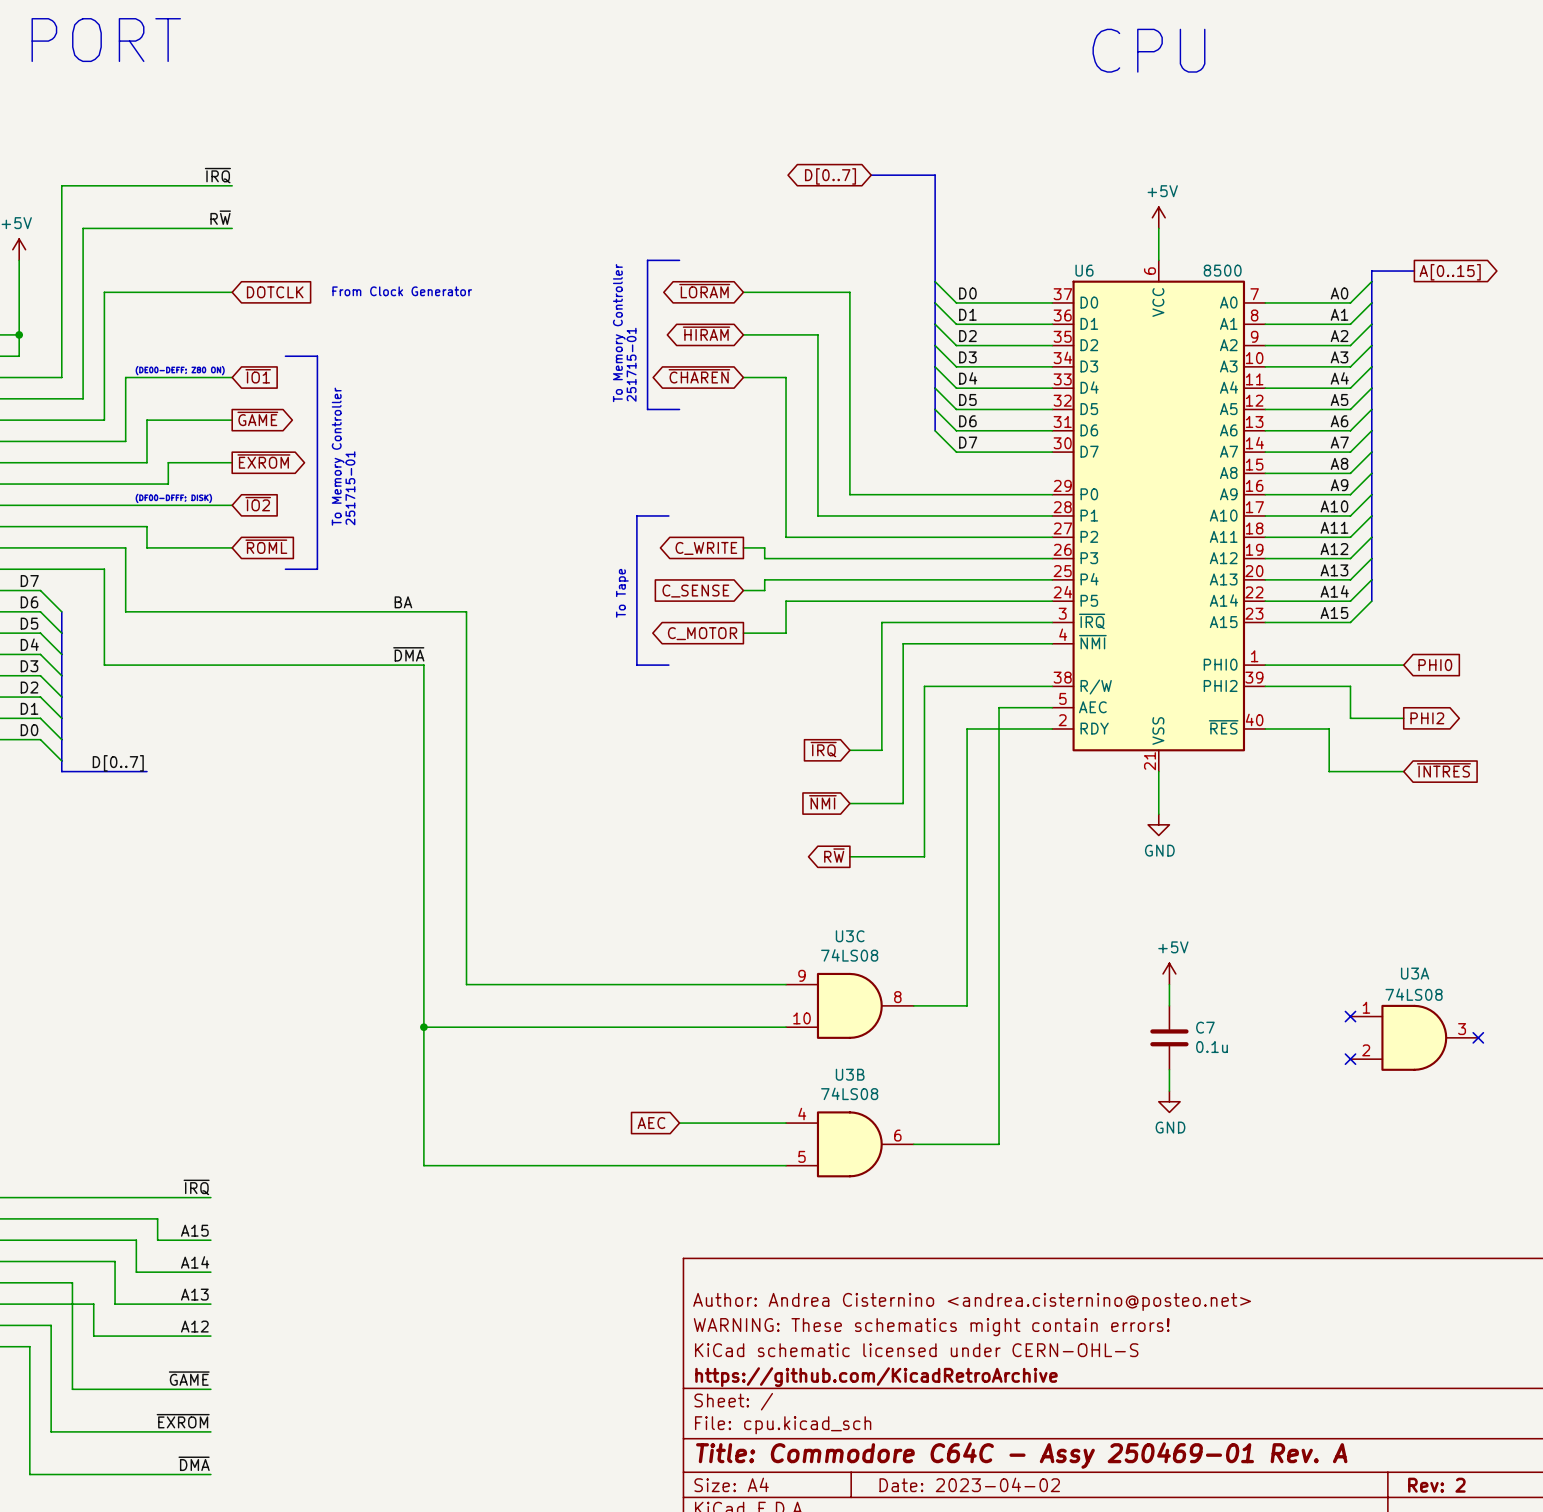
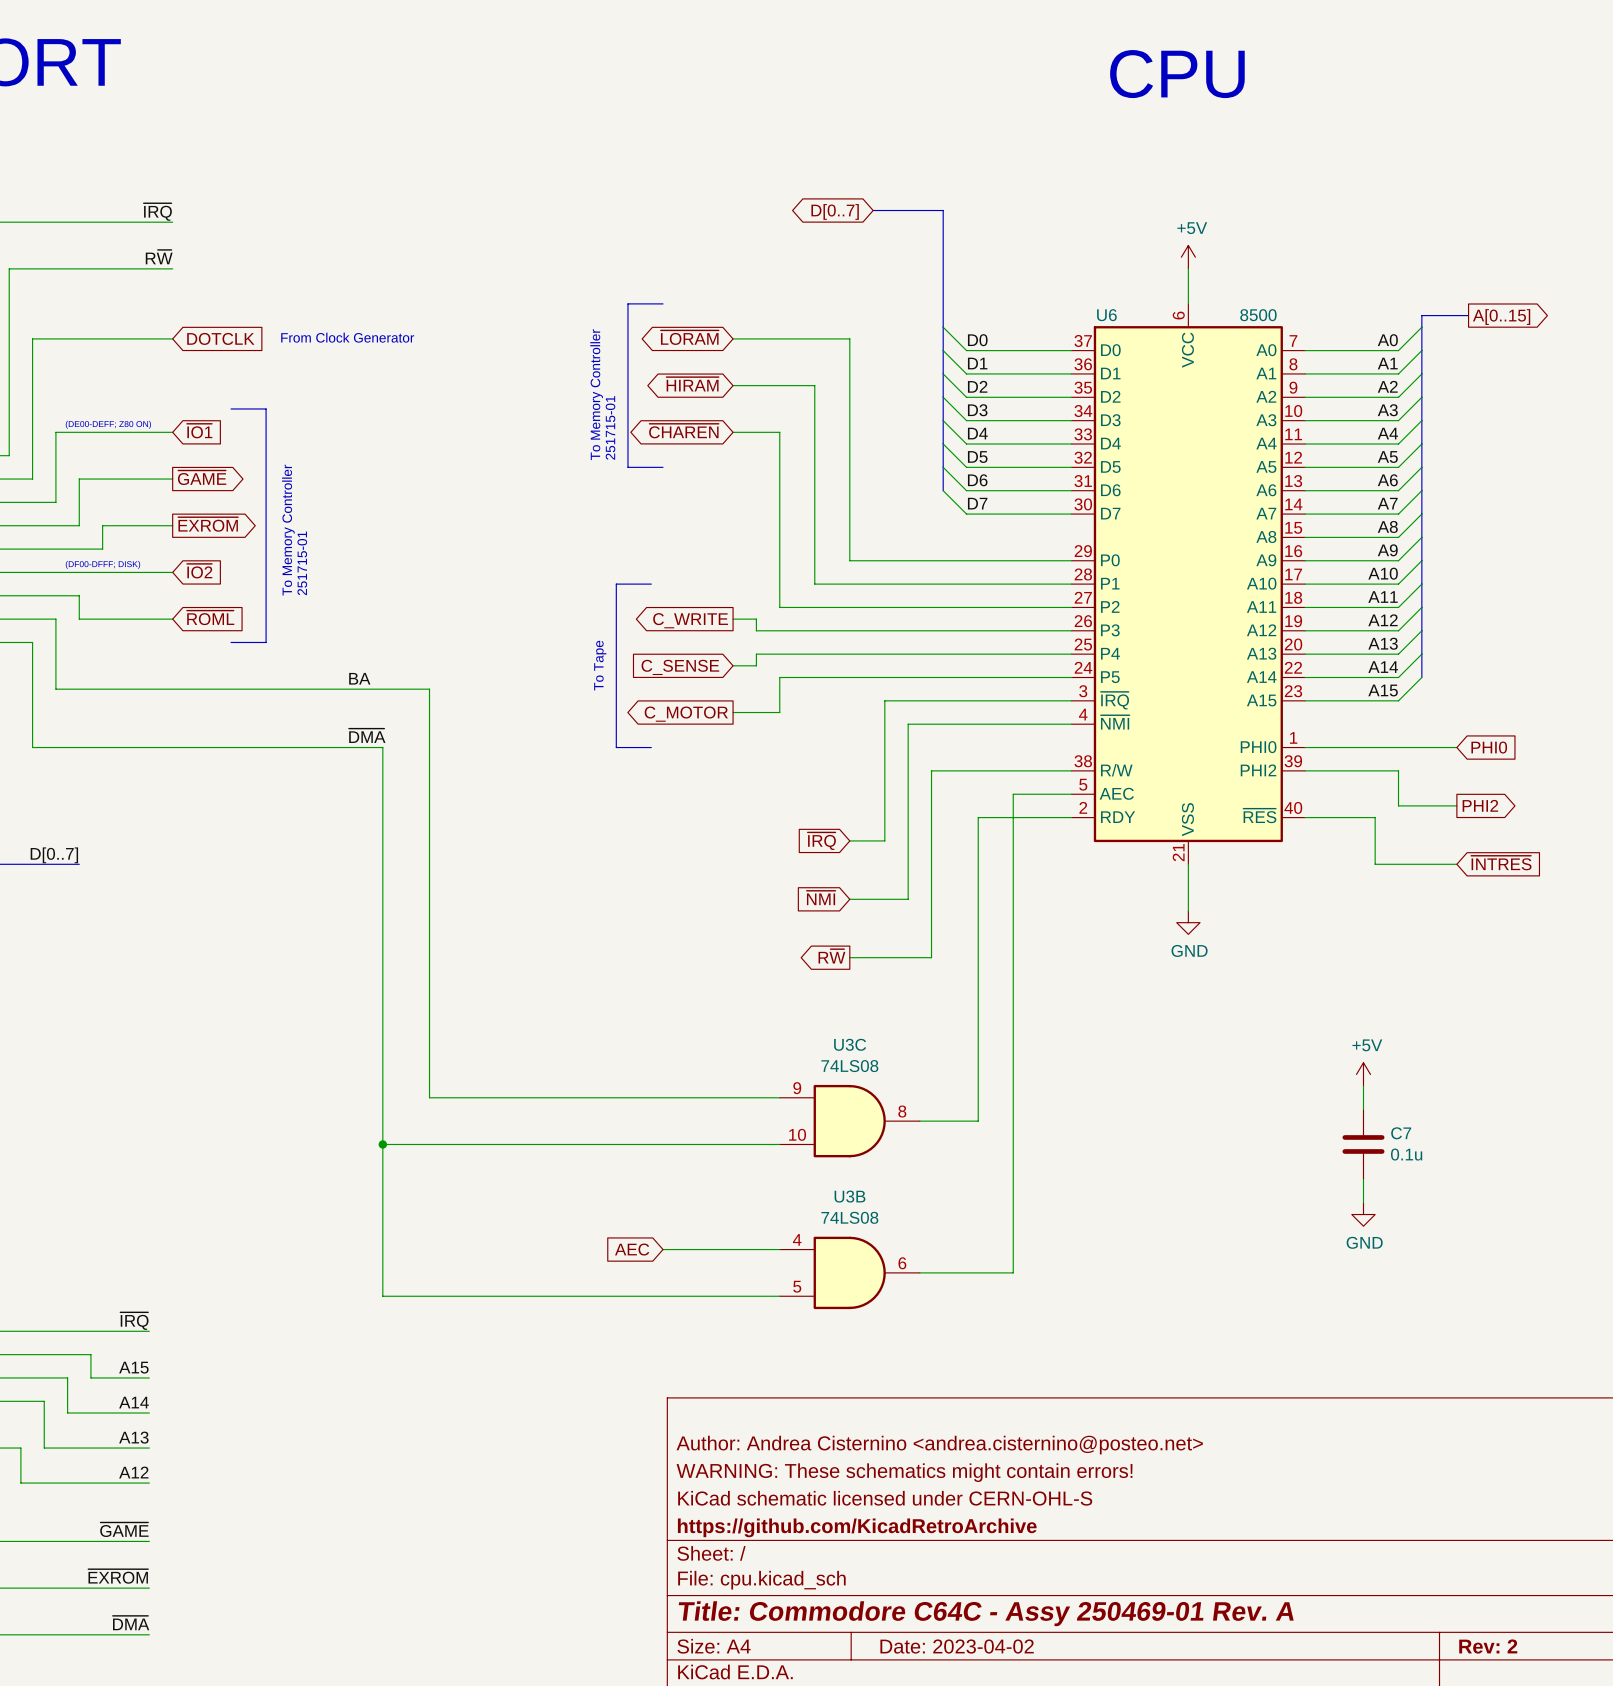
power symbol position: +5V (1169, 973) -> +5V (1363, 1074)
wire: (1169, 984) (1169, 1005) -> (1363, 1086) (1363, 1109)
no-connect mark: (1350, 1016) -> none
C7 position: (1169, 1037) -> (1363, 1144)
U3A: 74LS08 (1414, 1037) -> none
no-connect mark: (1478, 1037) -> none
no-connect mark: (1350, 1059) -> none
wire: (1169, 1069) (1169, 1091) -> (1363, 1179) (1363, 1202)
power symbol position: GND (1169, 1101) -> GND (1363, 1214)

